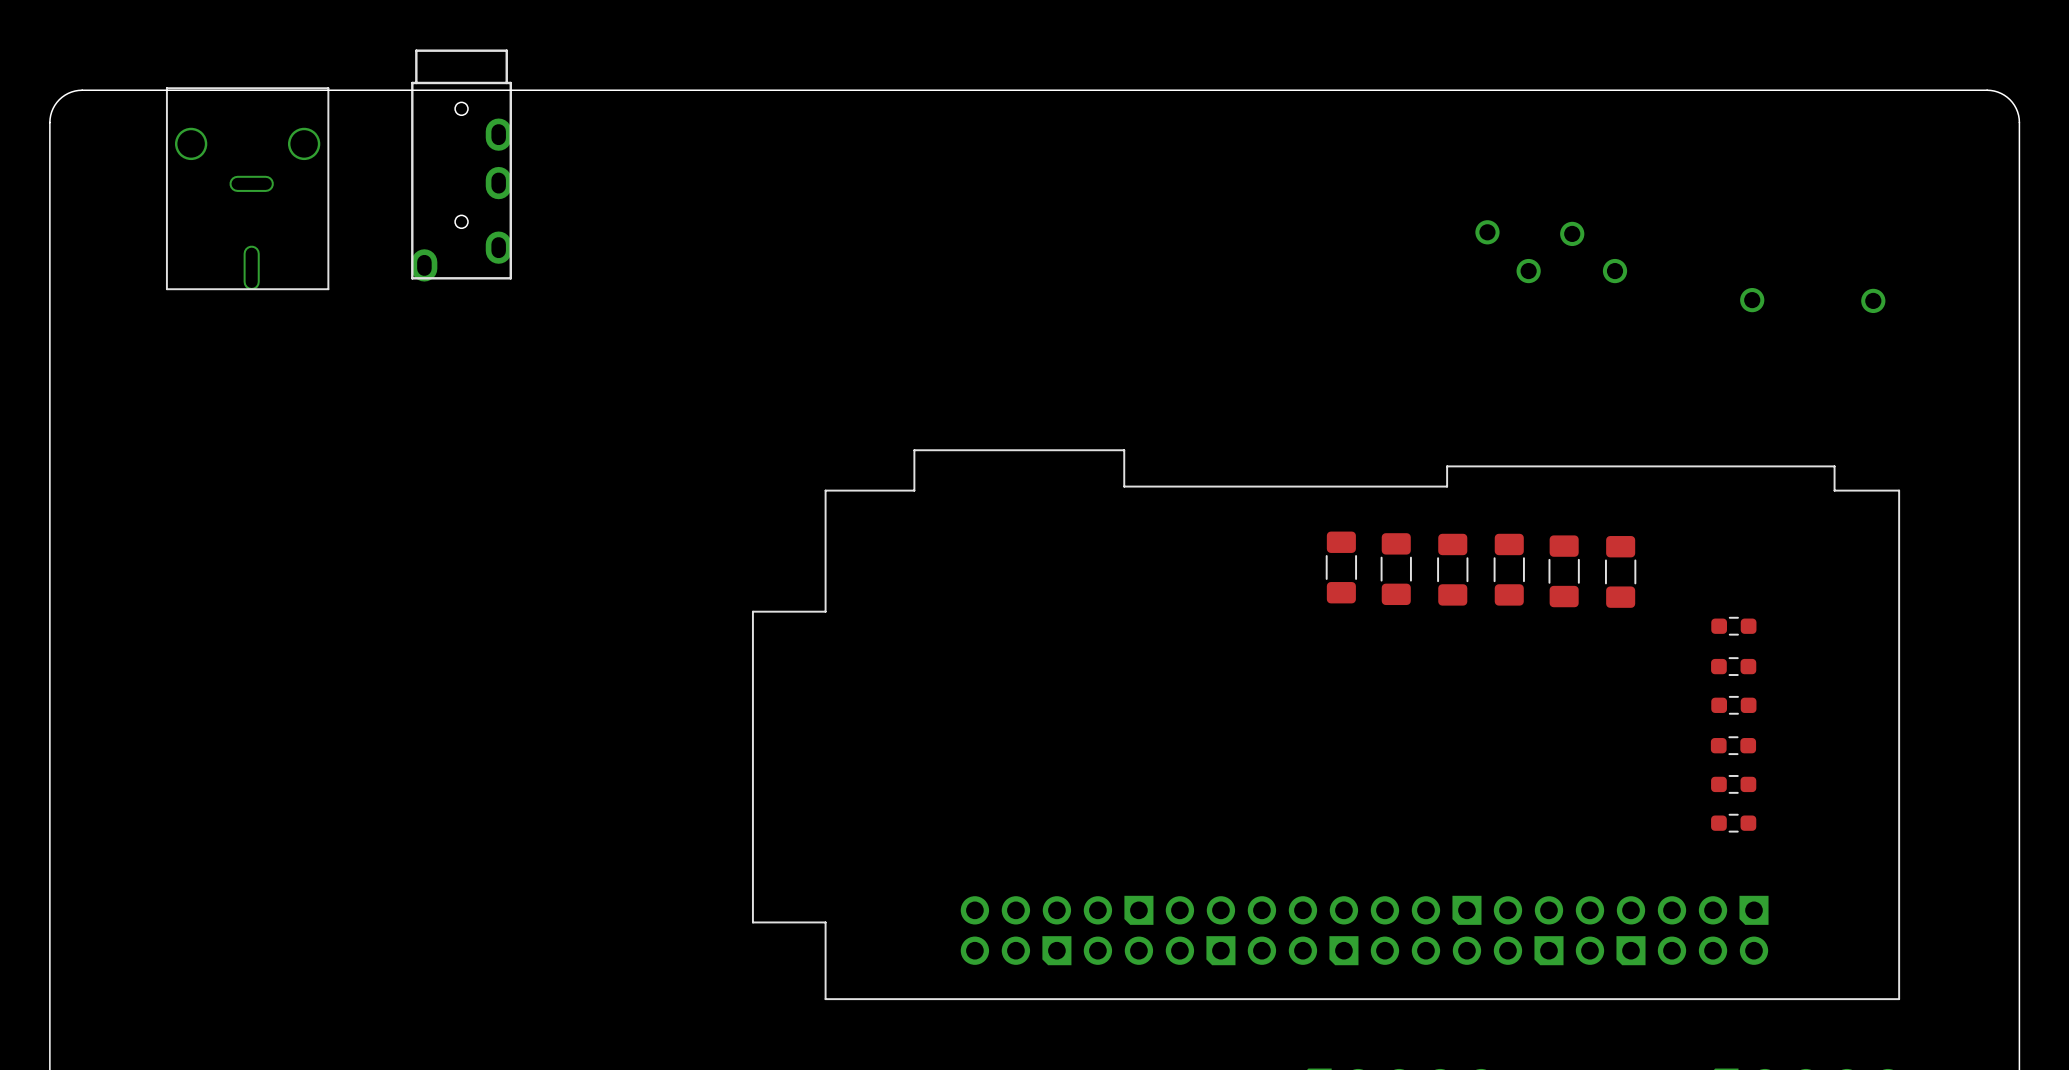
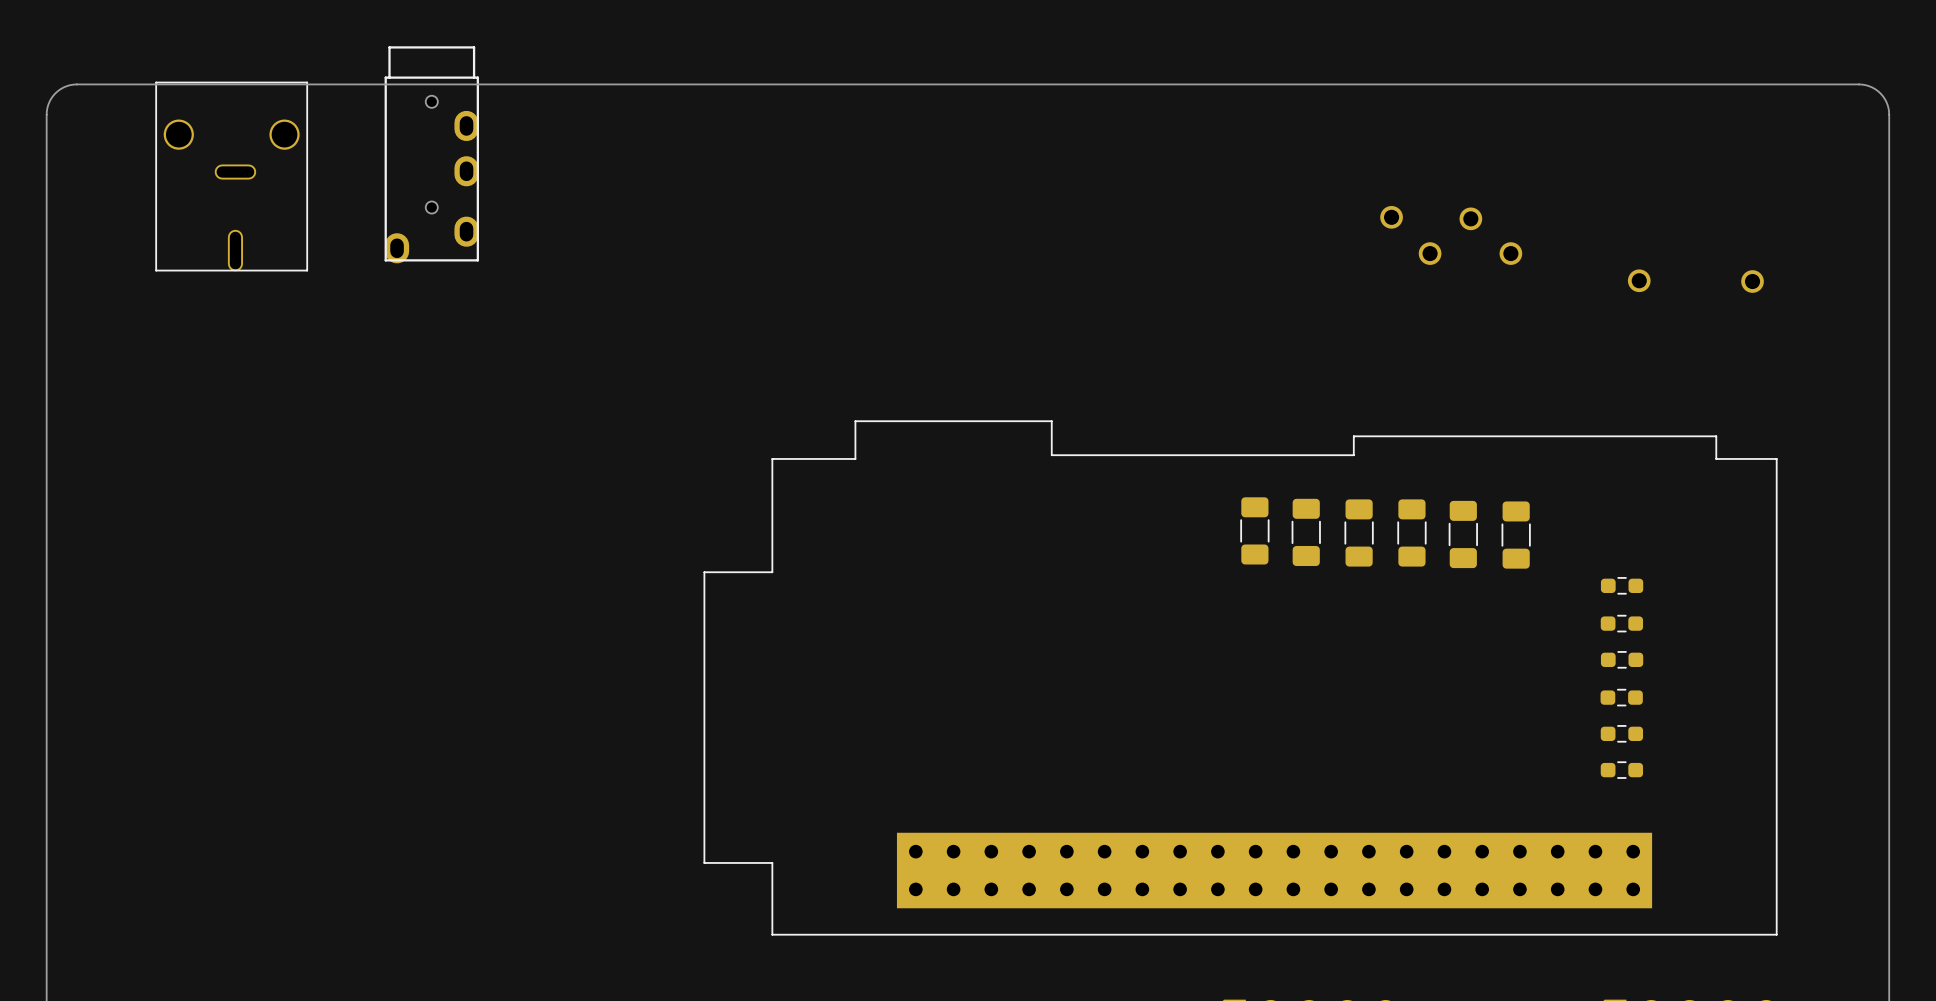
part footprint: [751, 449, 1901, 1001] -> [703, 420, 1778, 936]

